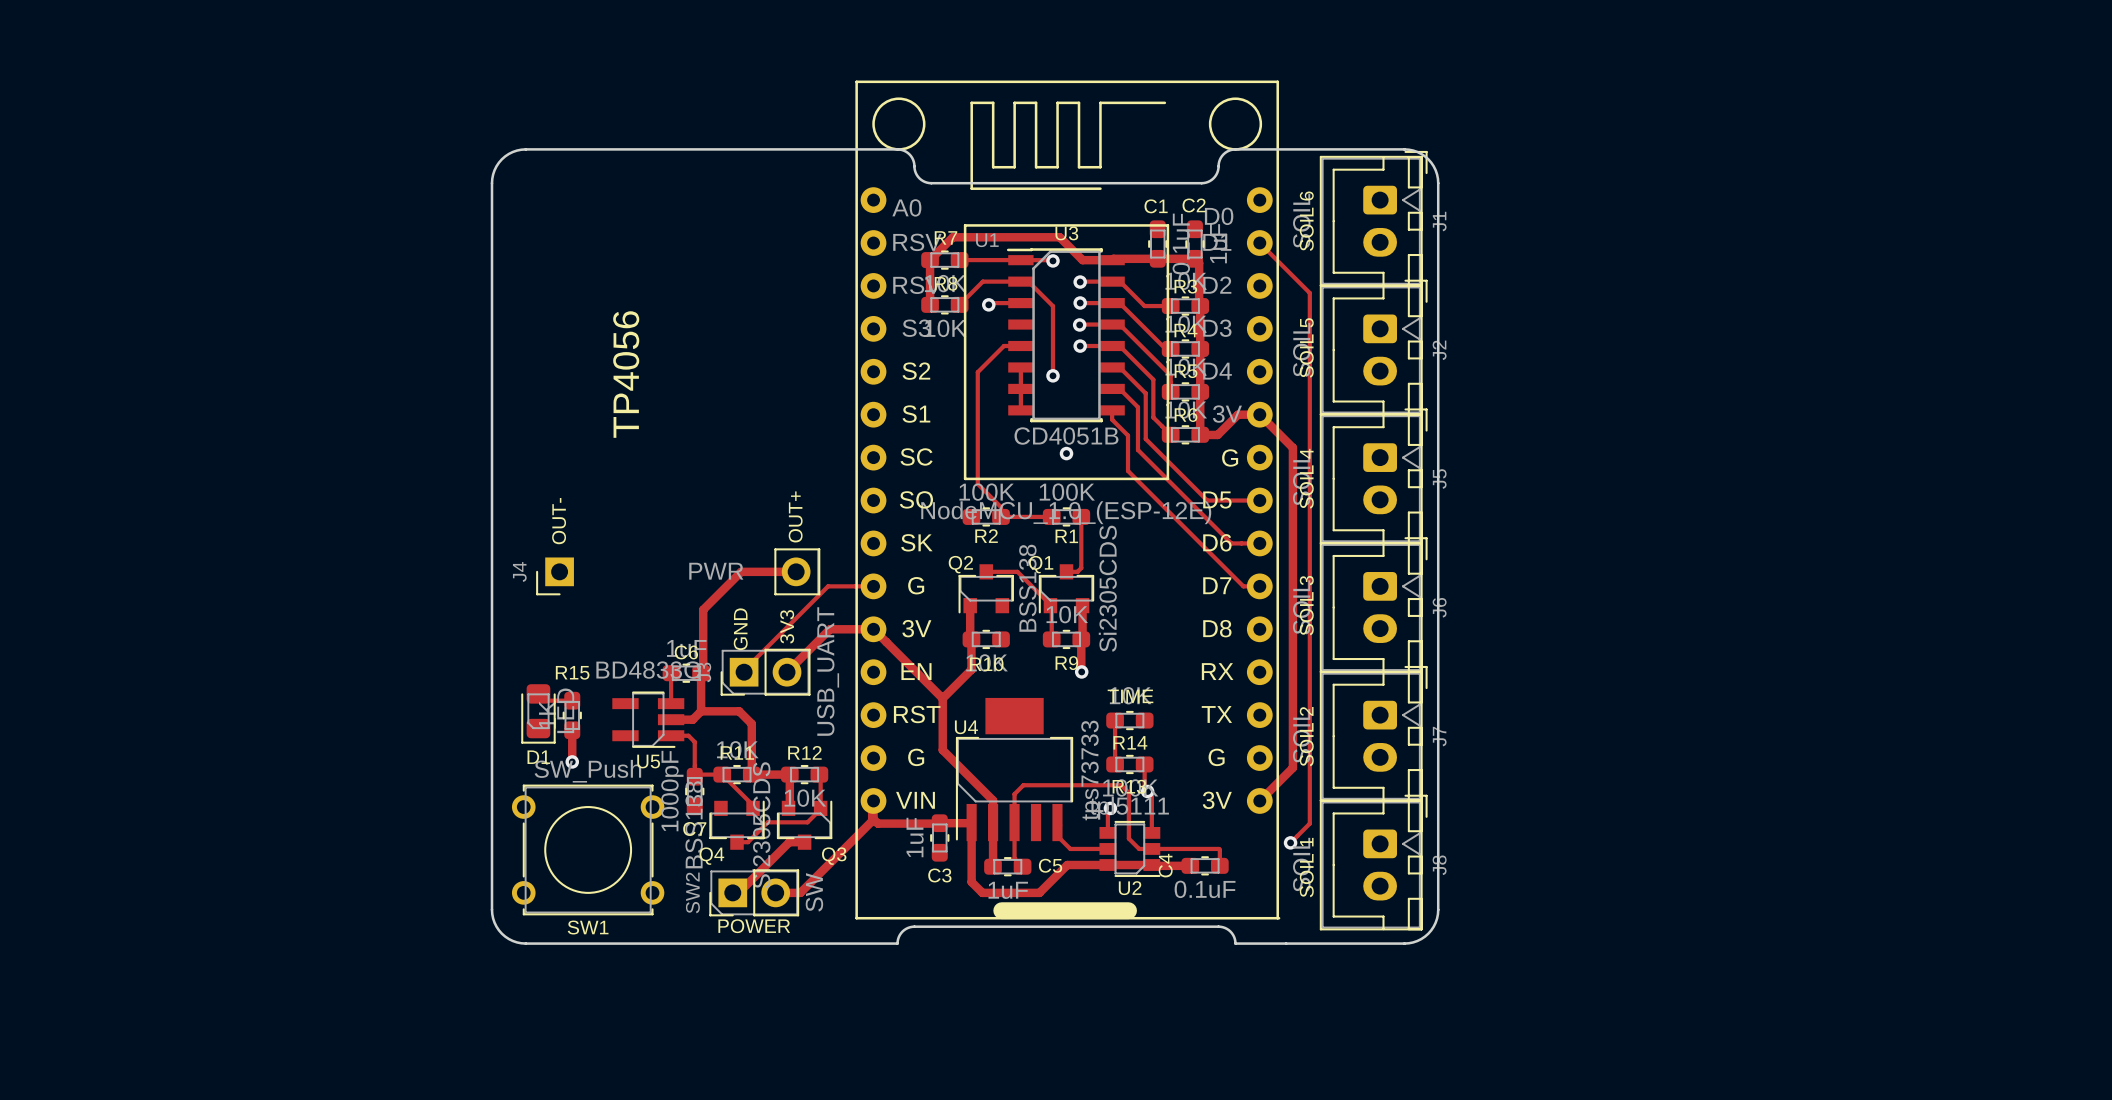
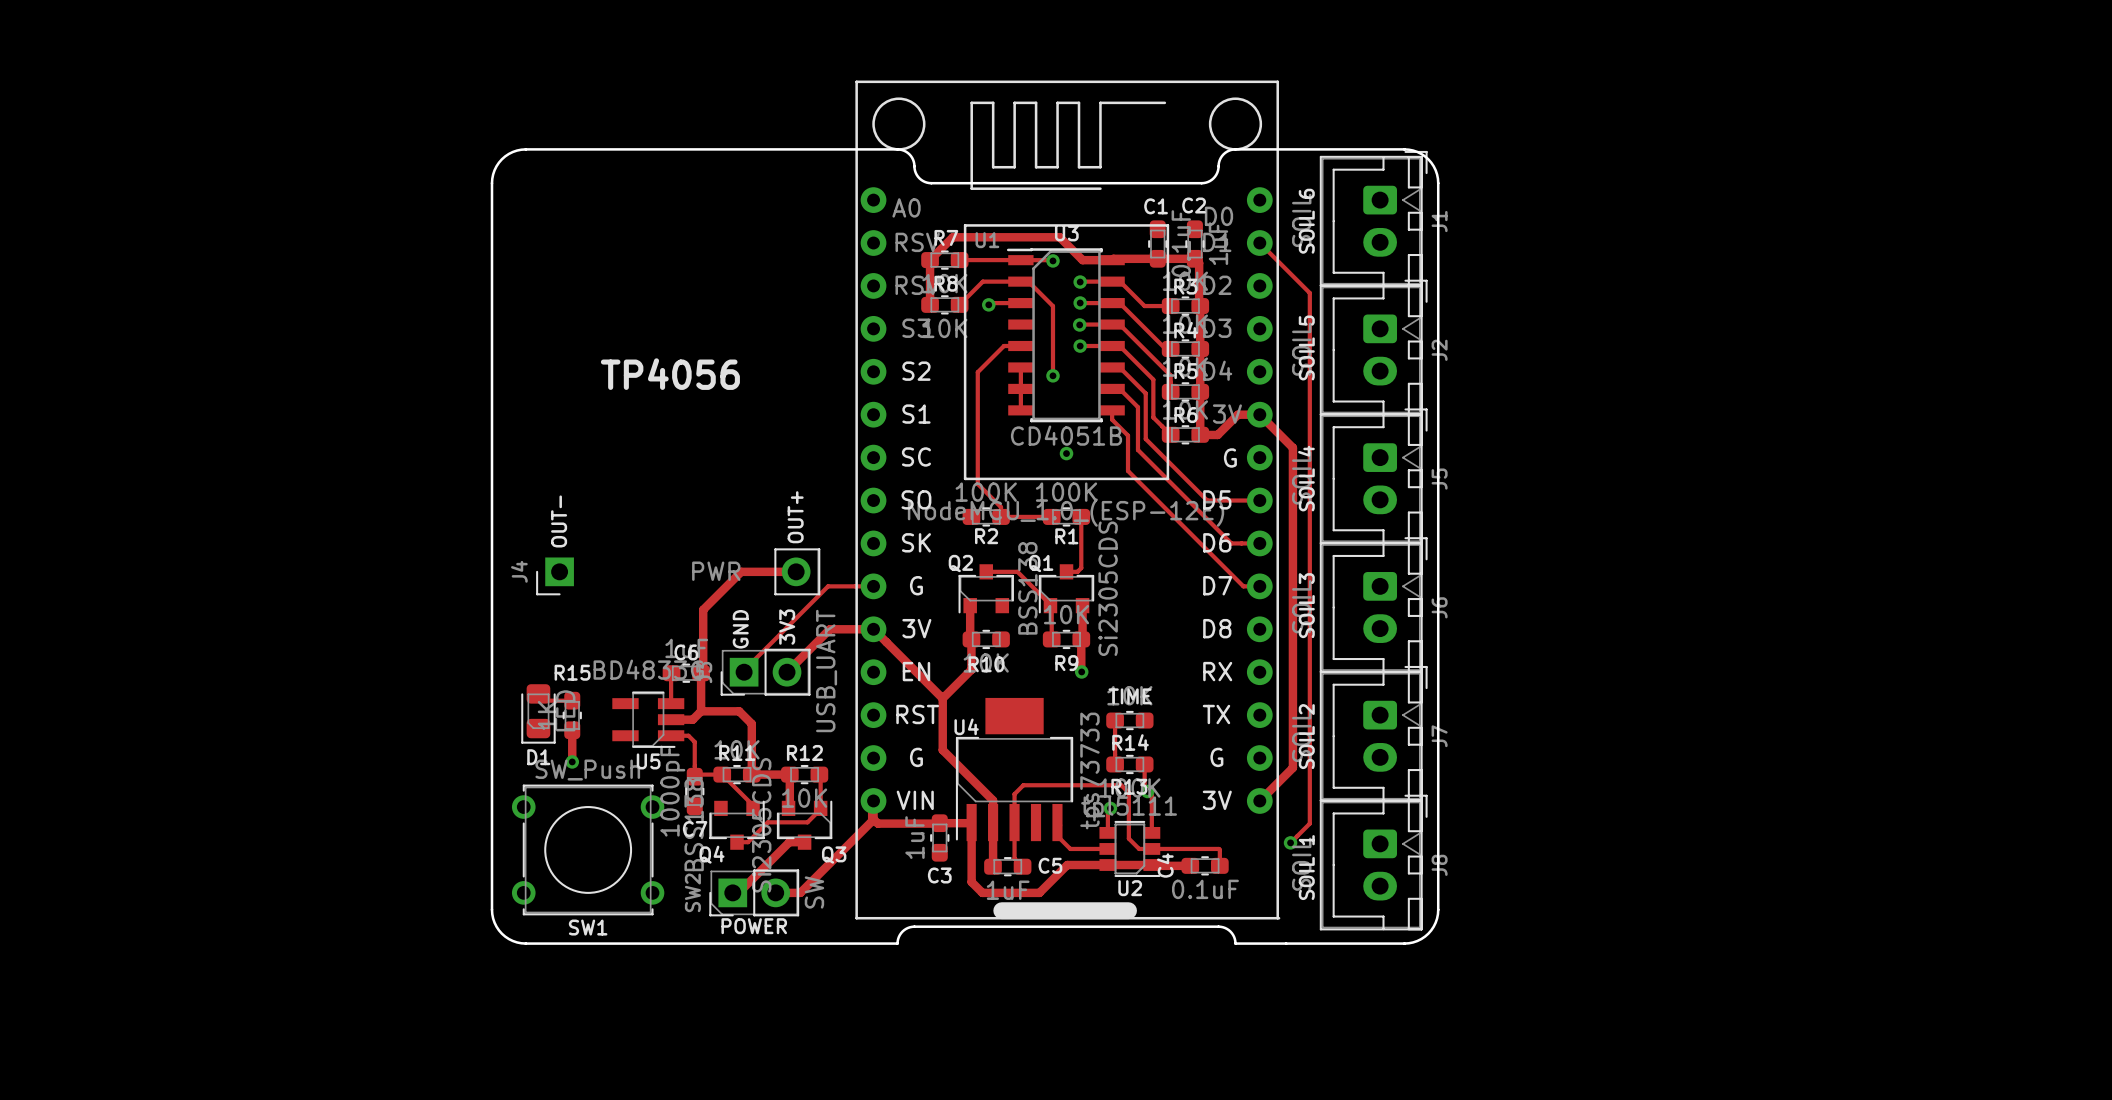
text rotation: 0° (626, 374) -> 90° clockwise (670, 374)

